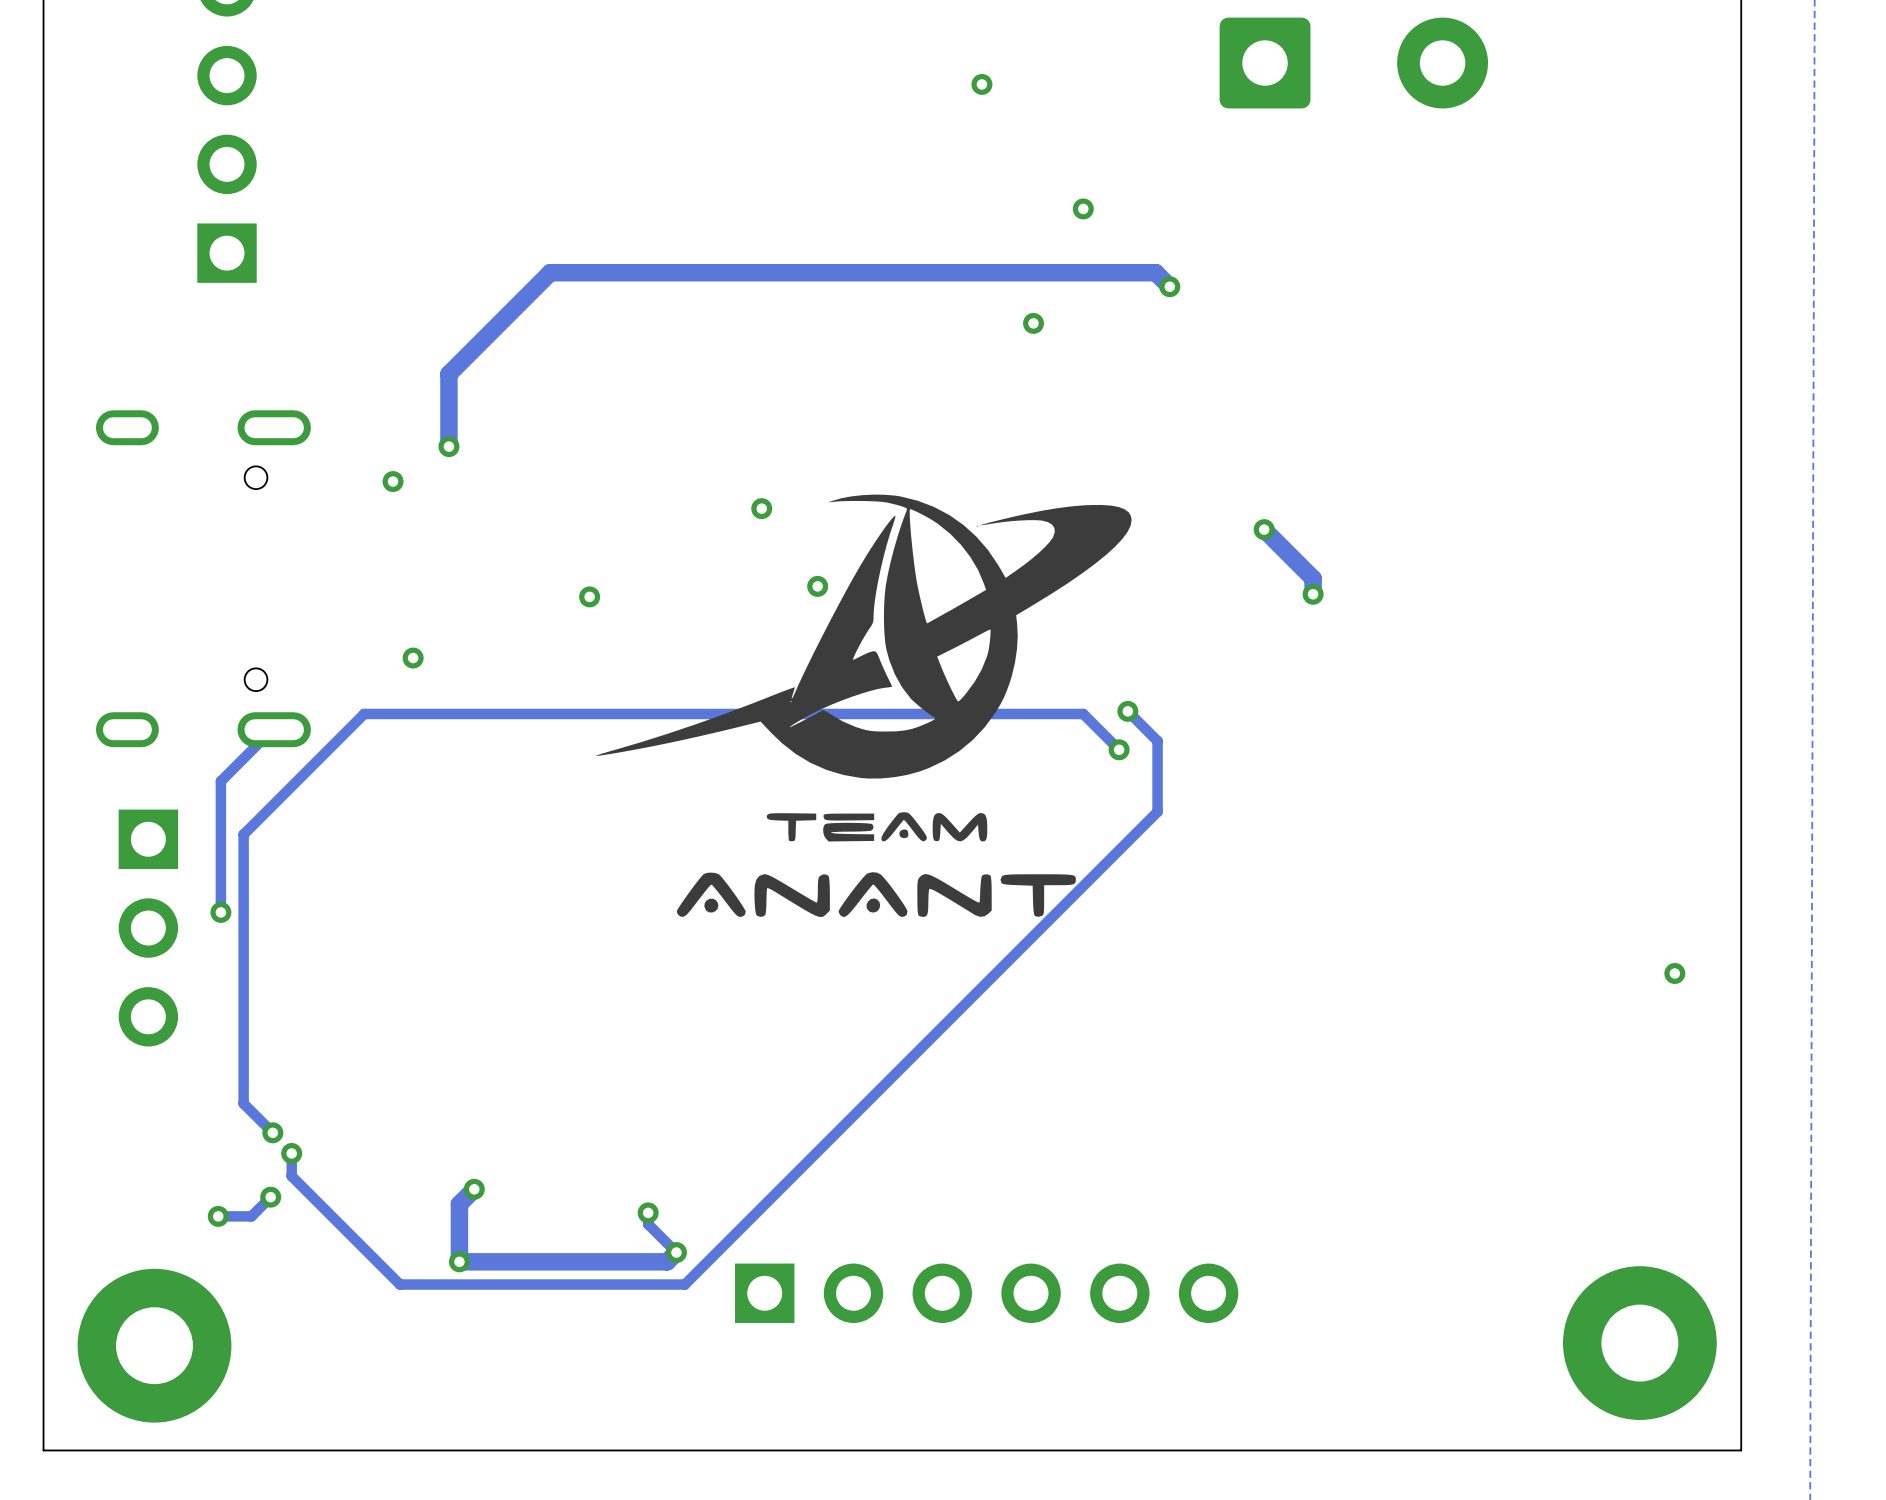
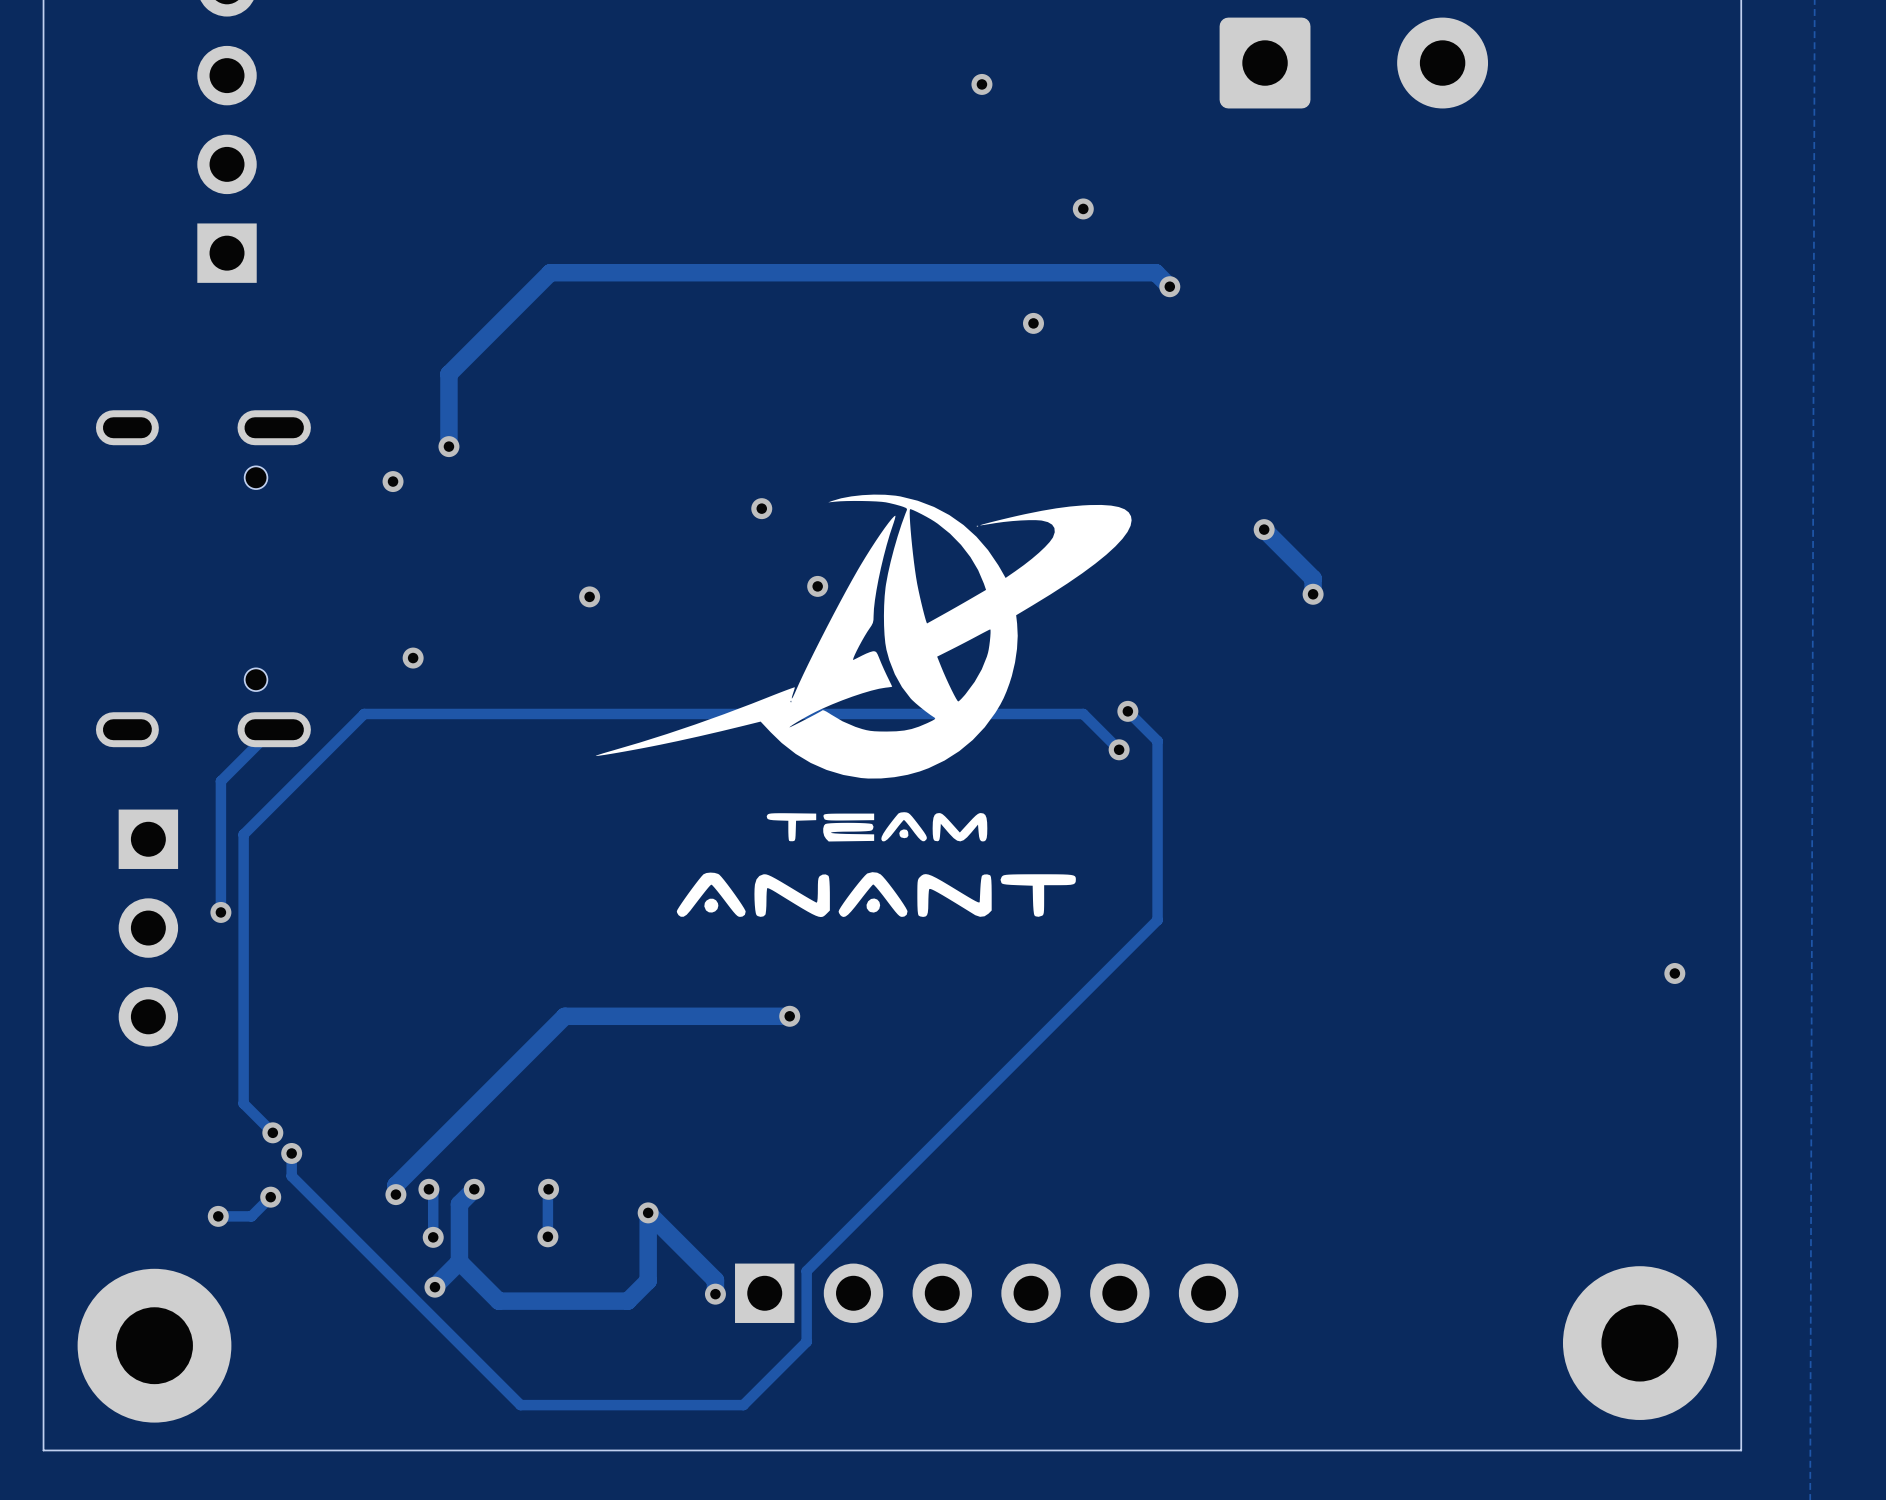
track: (1157, 811) (684, 1284) (400, 1284) -> (1157, 811) (1157, 920) (806, 1271) (806, 1341) (743, 1405) (520, 1405) (400, 1284)
track: none -> (789, 1016) (564, 1016) (395, 1185) (395, 1194)
via: none -> (789, 1016)
track: none -> (428, 1189) (433, 1193) (433, 1237)
via: none -> (428, 1189)
track: none -> (548, 1189) (547, 1236)
via: none -> (548, 1189)
via: none -> (395, 1194)
track: none -> (648, 1212) (715, 1280) (715, 1294)
track: (648, 1224) (676, 1252) (667, 1261) (459, 1261) -> (648, 1224) (648, 1280) (627, 1301) (498, 1301) (459, 1261) (434, 1287)
via: none -> (547, 1236)
via: none -> (433, 1237)
via position: (676, 1252) -> (715, 1294)
via: (459, 1261) -> none
via: none -> (434, 1287)

